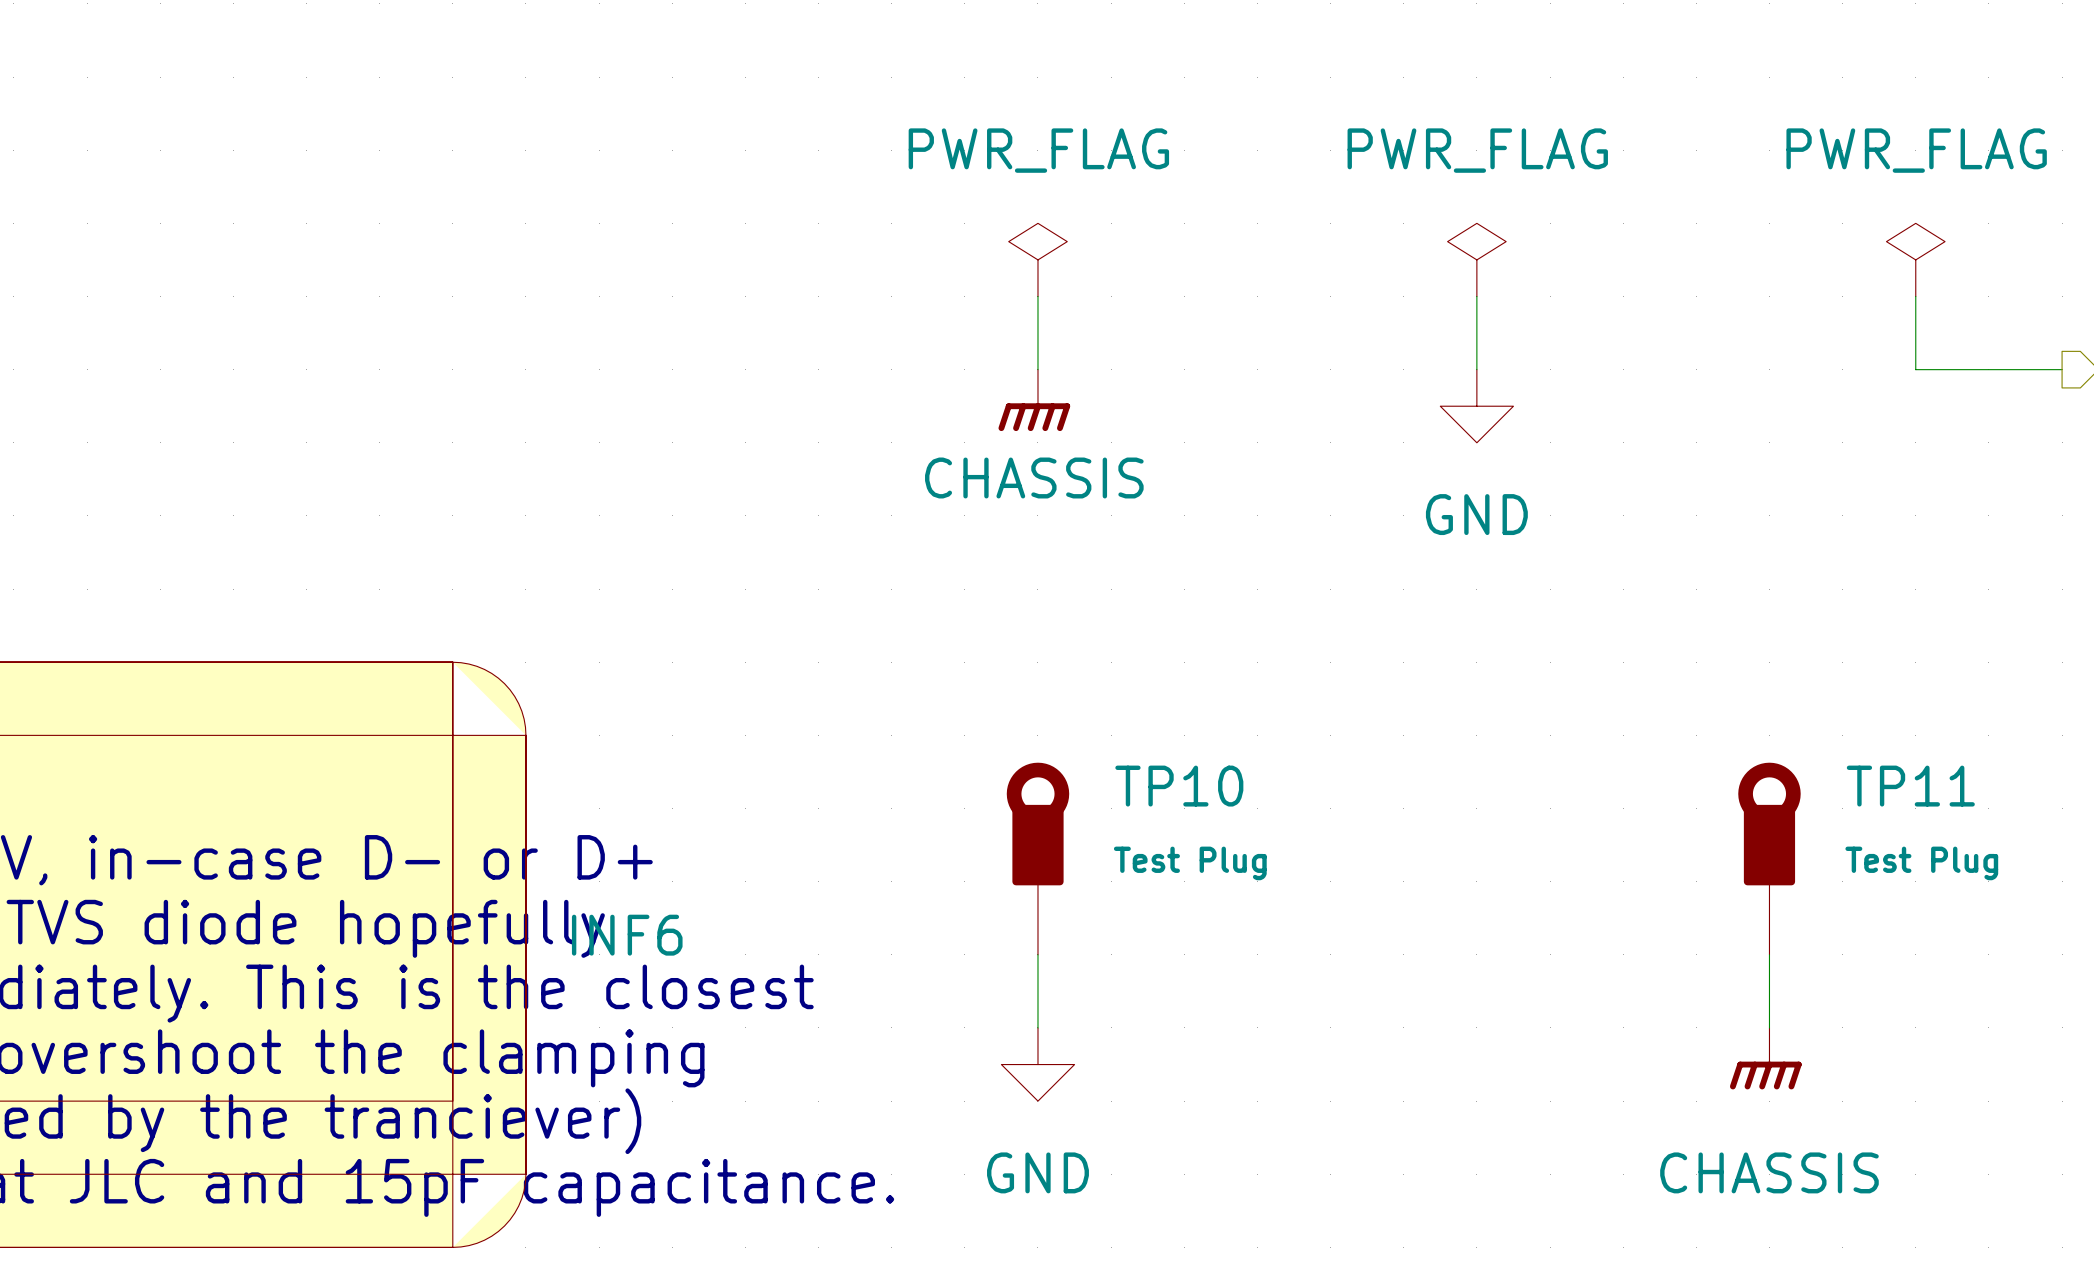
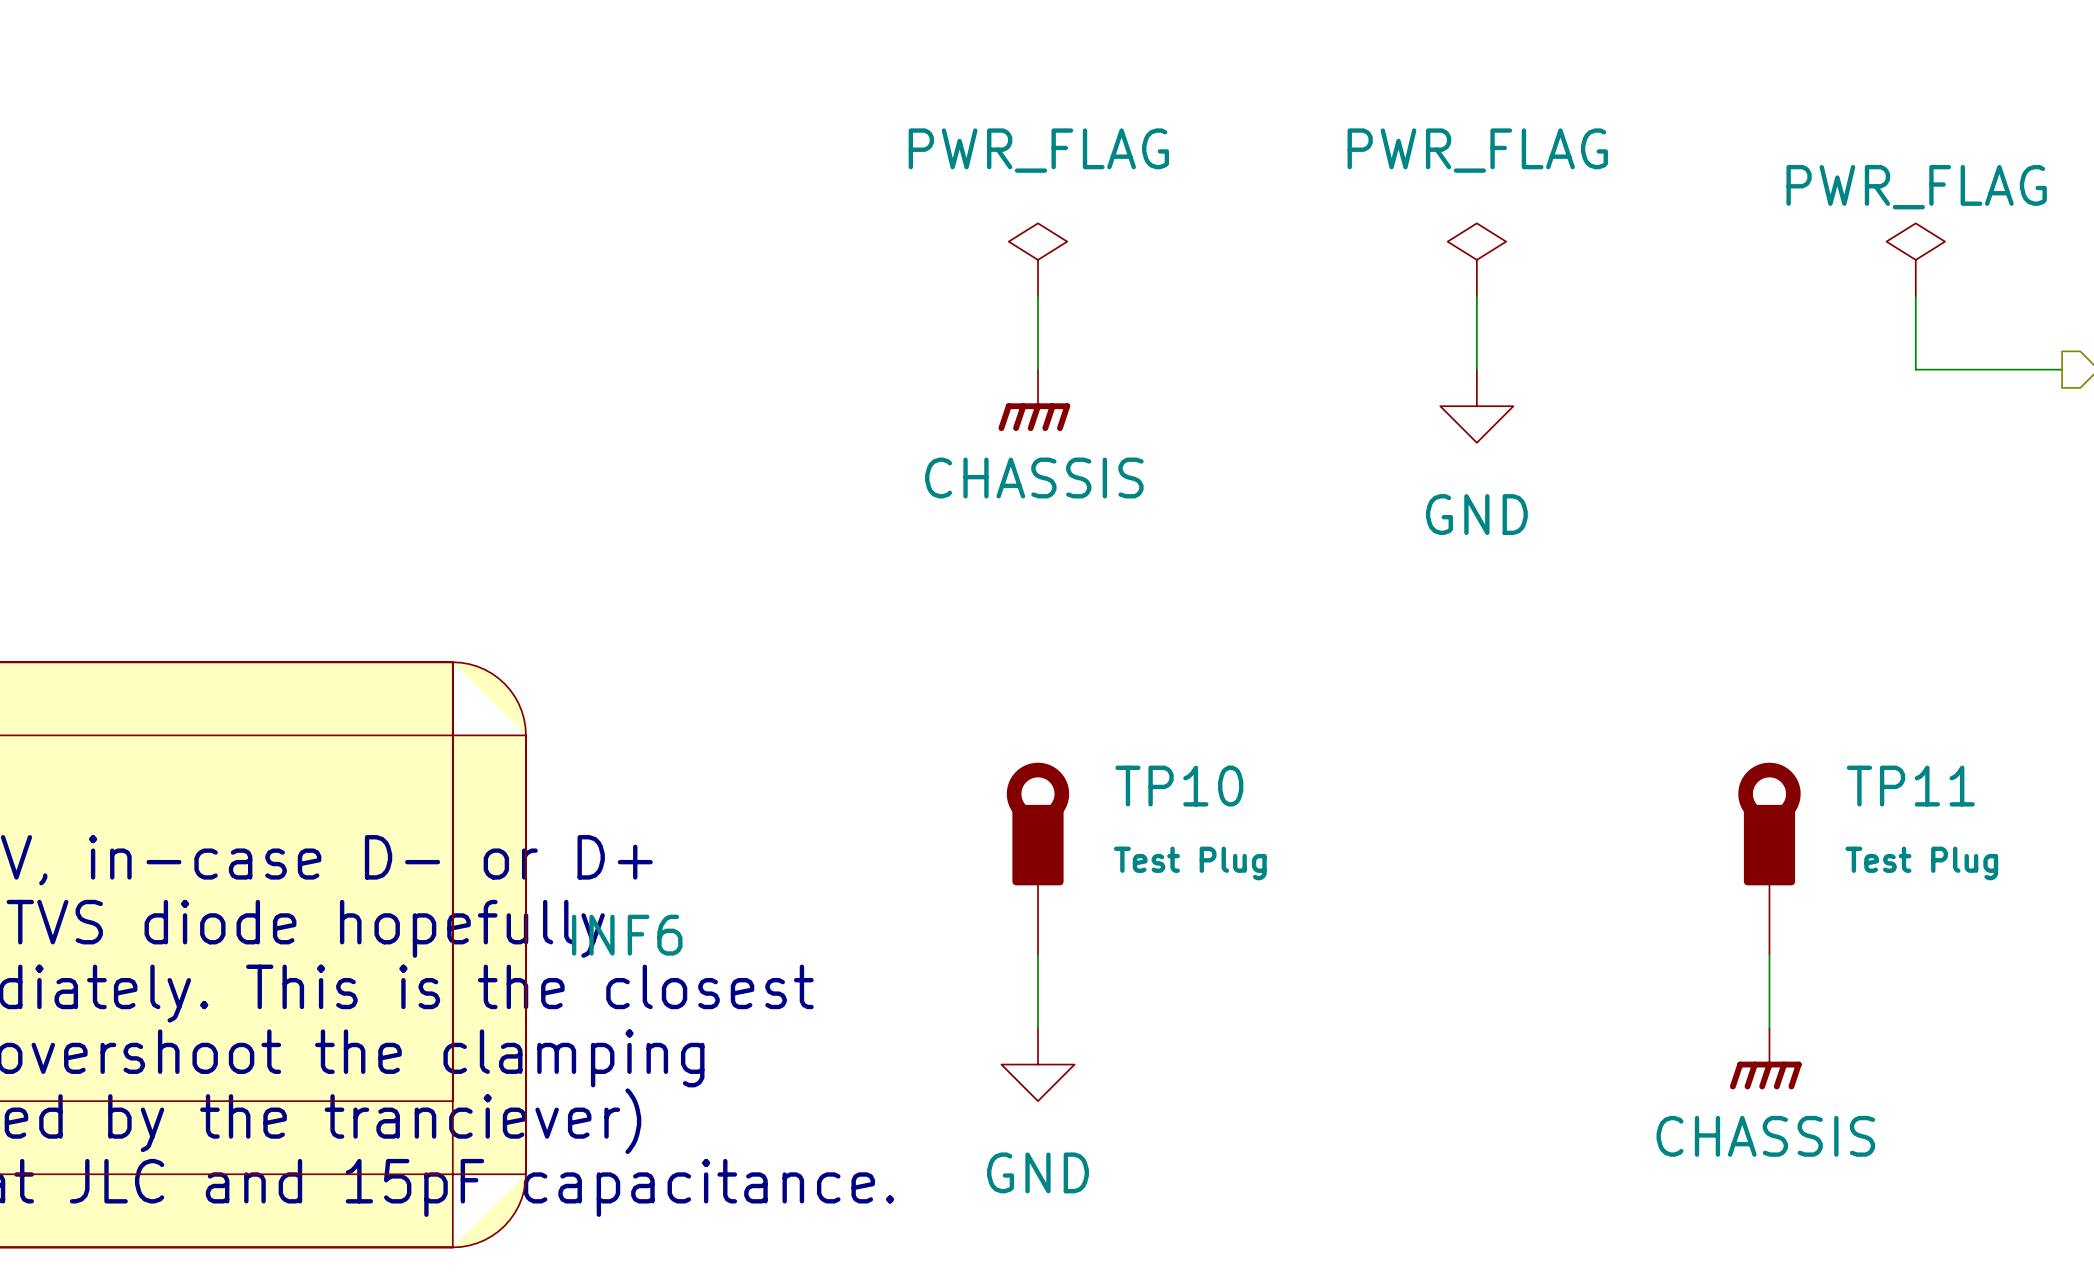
power symbol text position: PWR_FLAG (1916, 150) -> PWR_FLAG (1916, 187)
power symbol text position: CHASSIS (1769, 1172) -> CHASSIS (1765, 1136)

